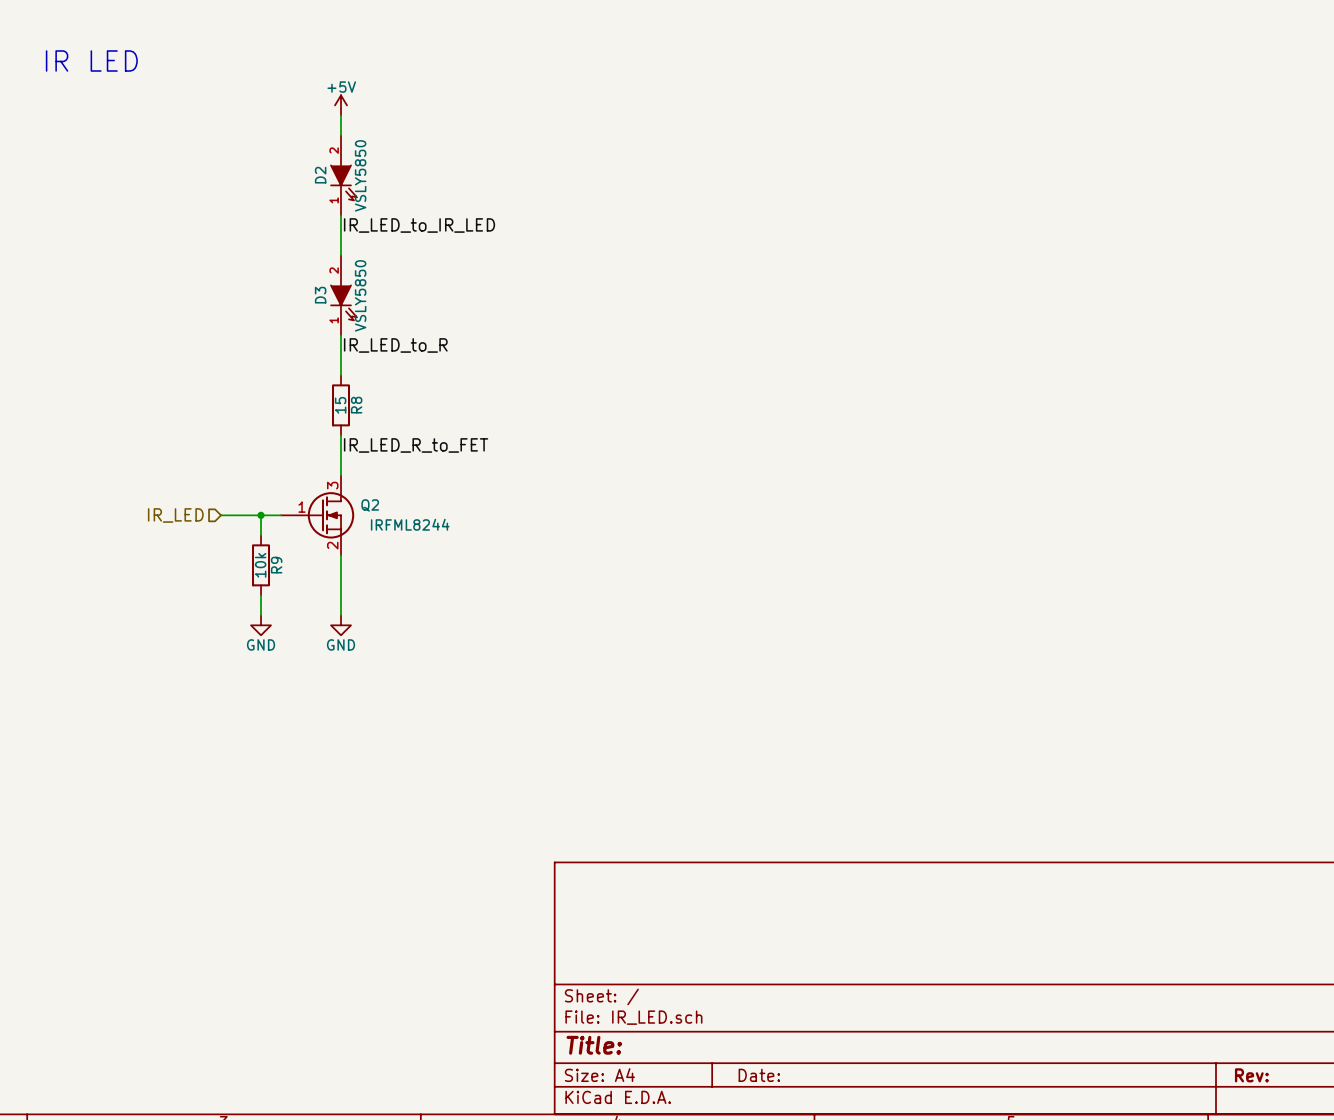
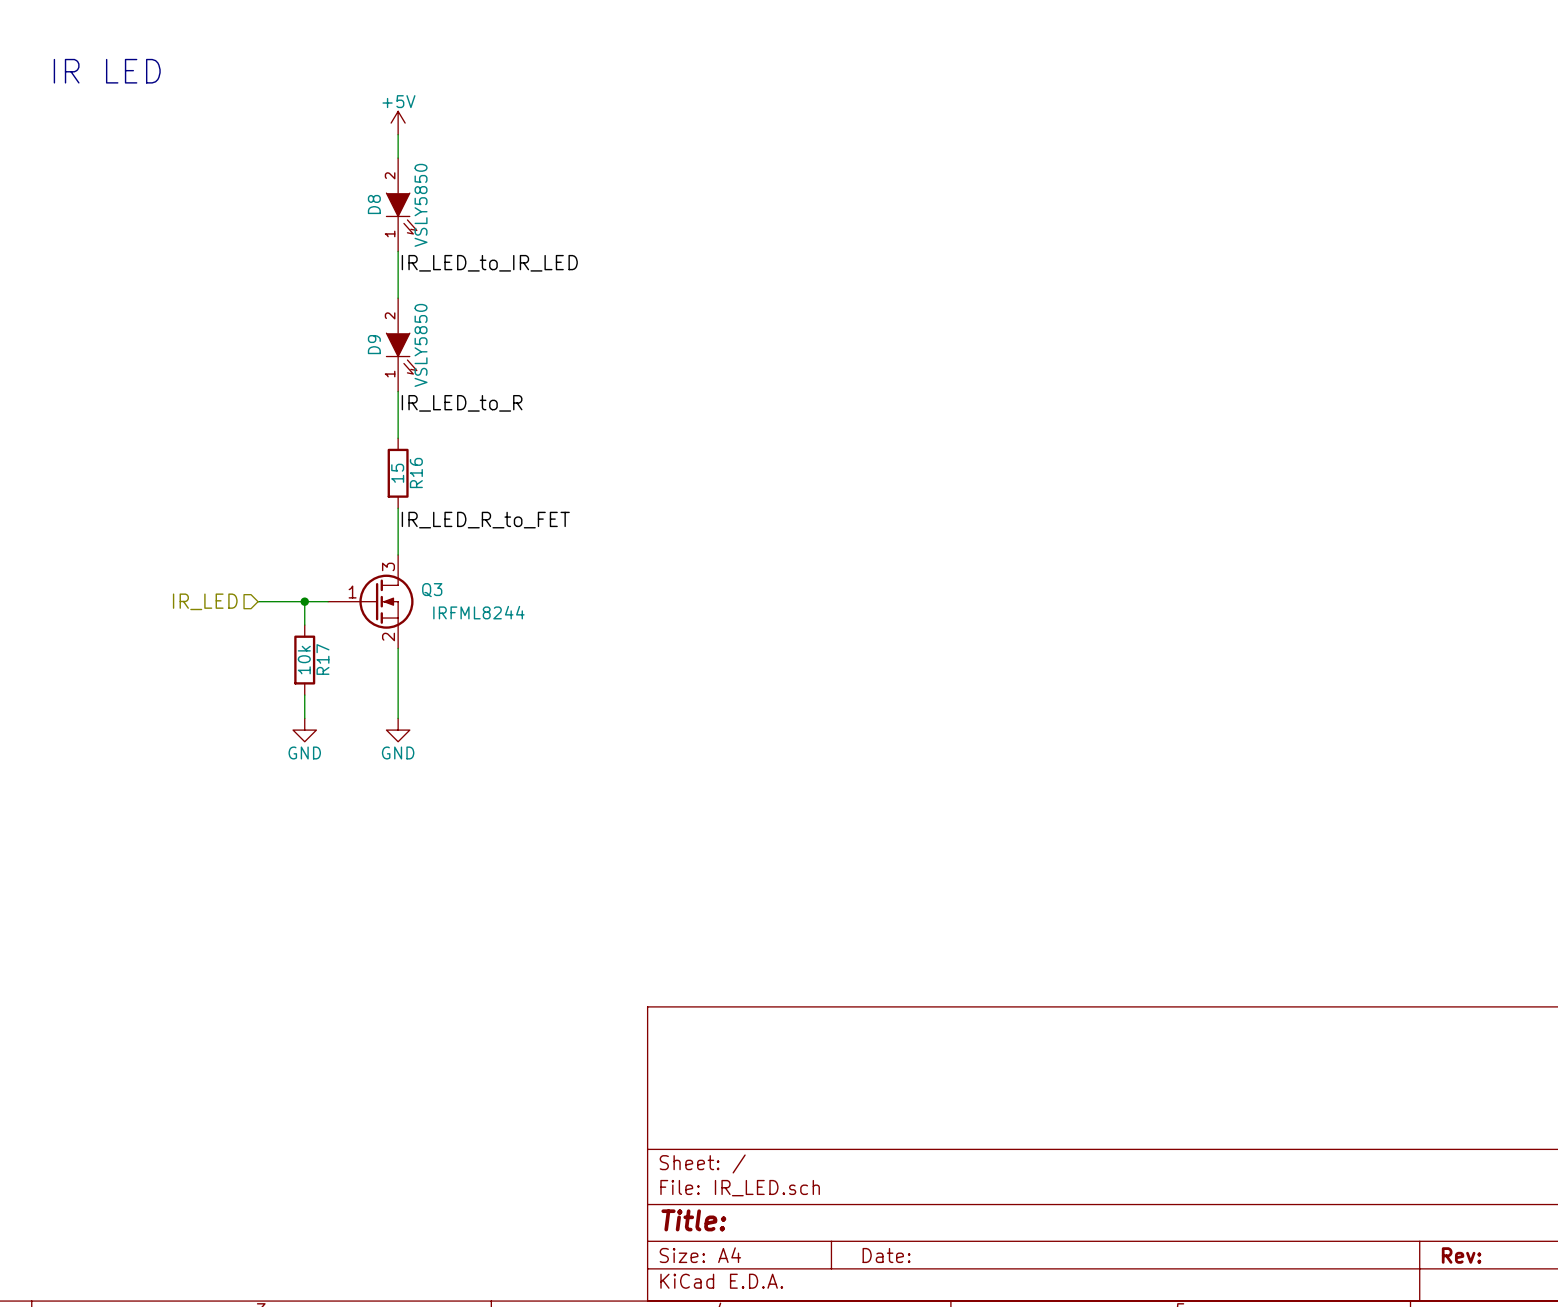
D2 name: D2 (320, 175) -> D8 (374, 204)
D3 name: D3 (320, 295) -> D9 (374, 344)
R8 name: R8 (356, 405) -> R16 (416, 472)
Q2 name: Q2 (370, 505) -> Q3 (432, 590)
R9 name: R9 (276, 565) -> R17 (322, 659)

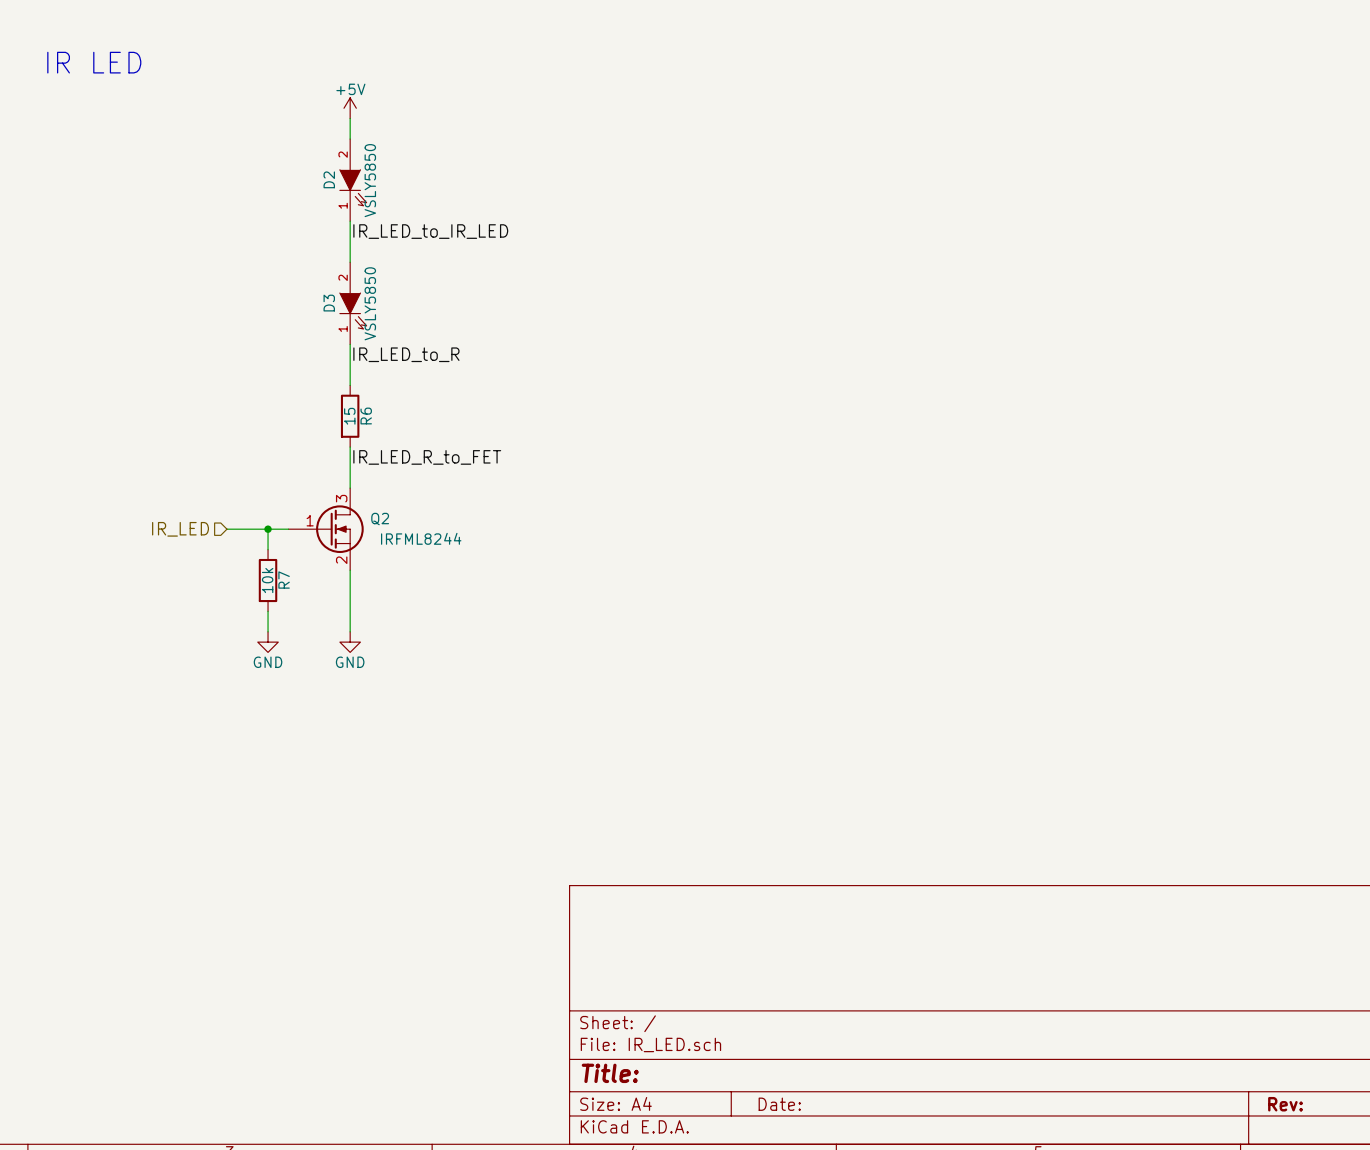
D8 name: D8 (374, 204) -> D2 (329, 179)
D9 name: D9 (374, 344) -> D3 (329, 303)
R16 name: R16 (416, 472) -> R6 (366, 416)
Q3 name: Q3 (432, 590) -> Q2 (380, 519)
R17 name: R17 (322, 659) -> R7 (284, 580)

